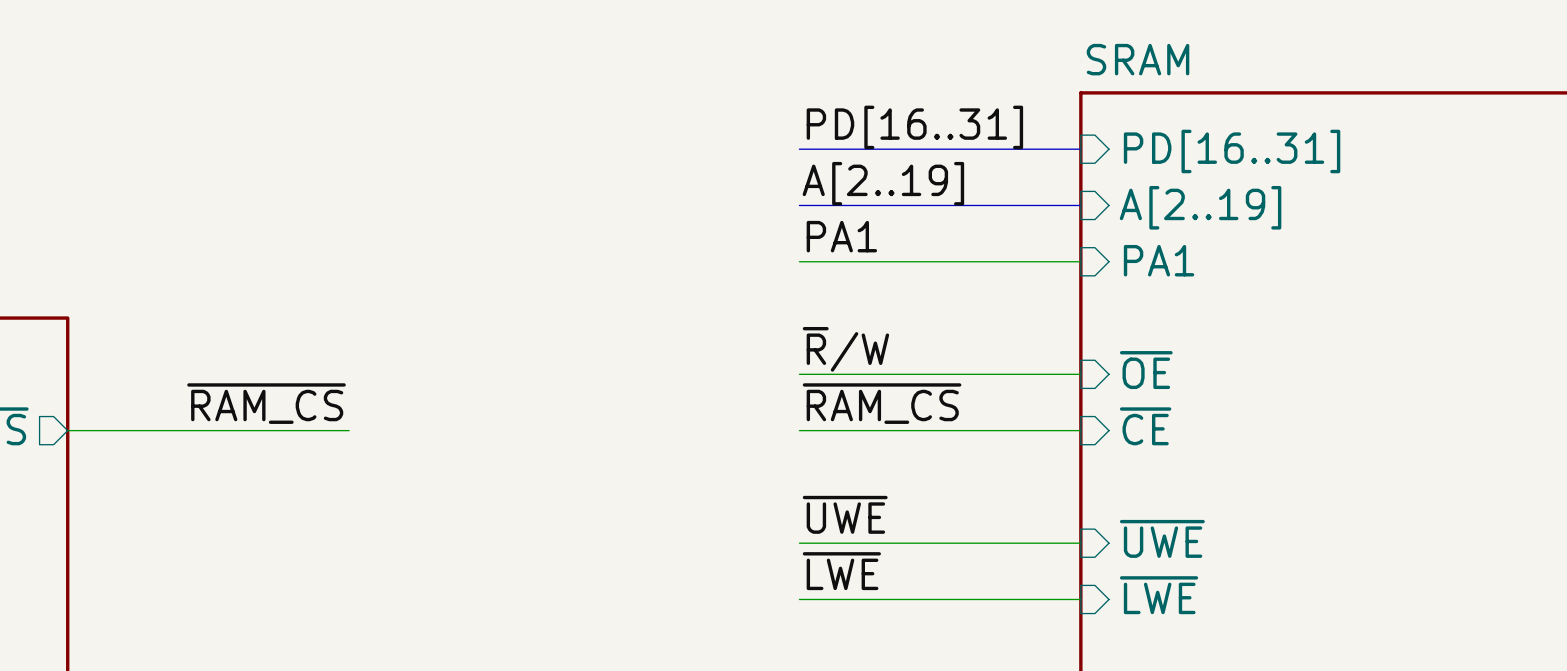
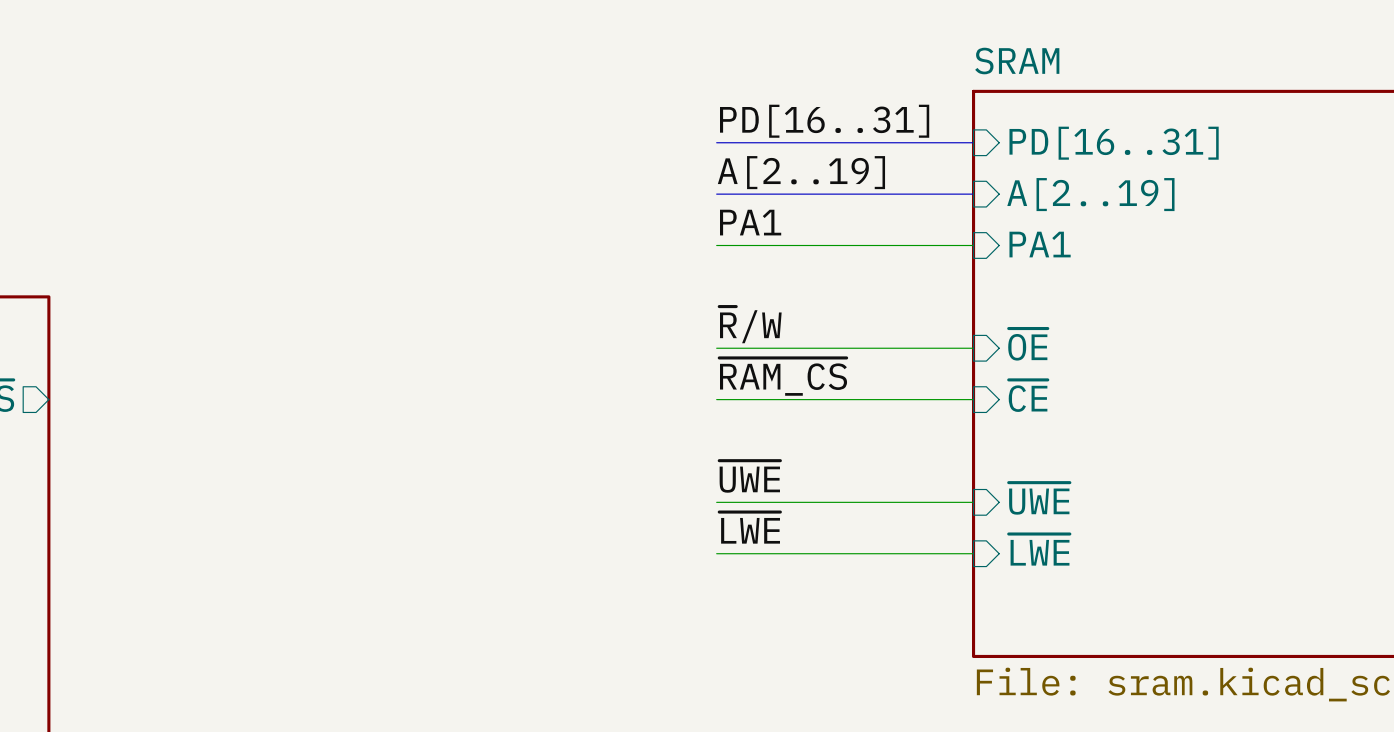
label: ~{RAM_CS} (266, 403) -> none
wire: (67, 430) (349, 430) -> none

